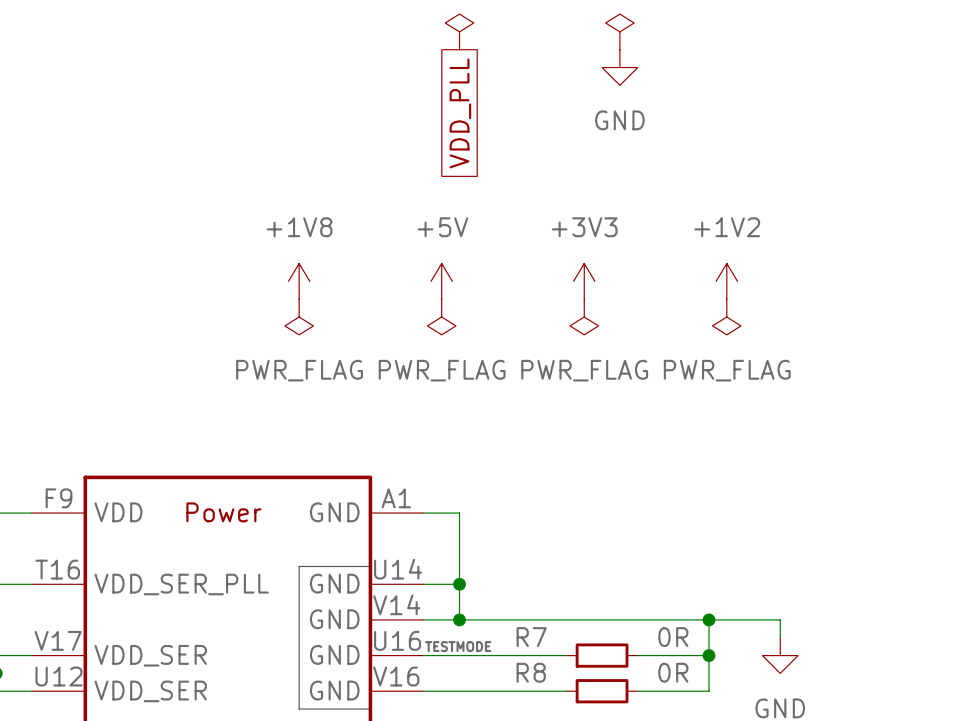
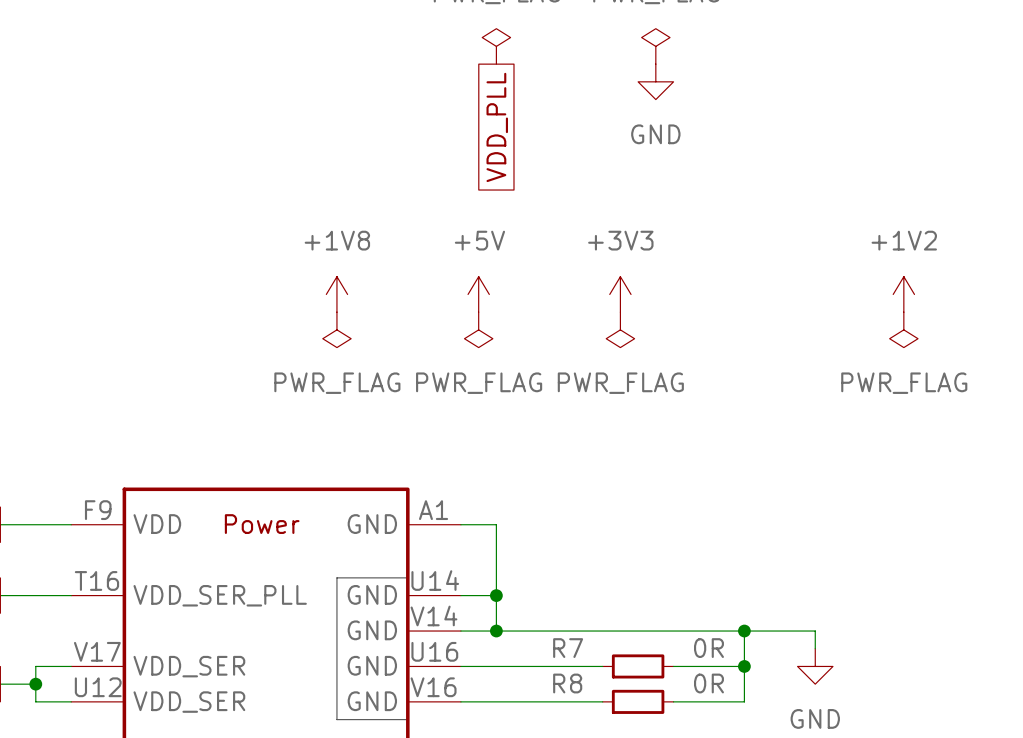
power symbol position: +1V2 (726, 281) -> +1V2 (903, 294)
power symbol position: PWR_FLAG (726, 317) -> PWR_FLAG (903, 329)
label: TESTMODE (458, 646) -> none

